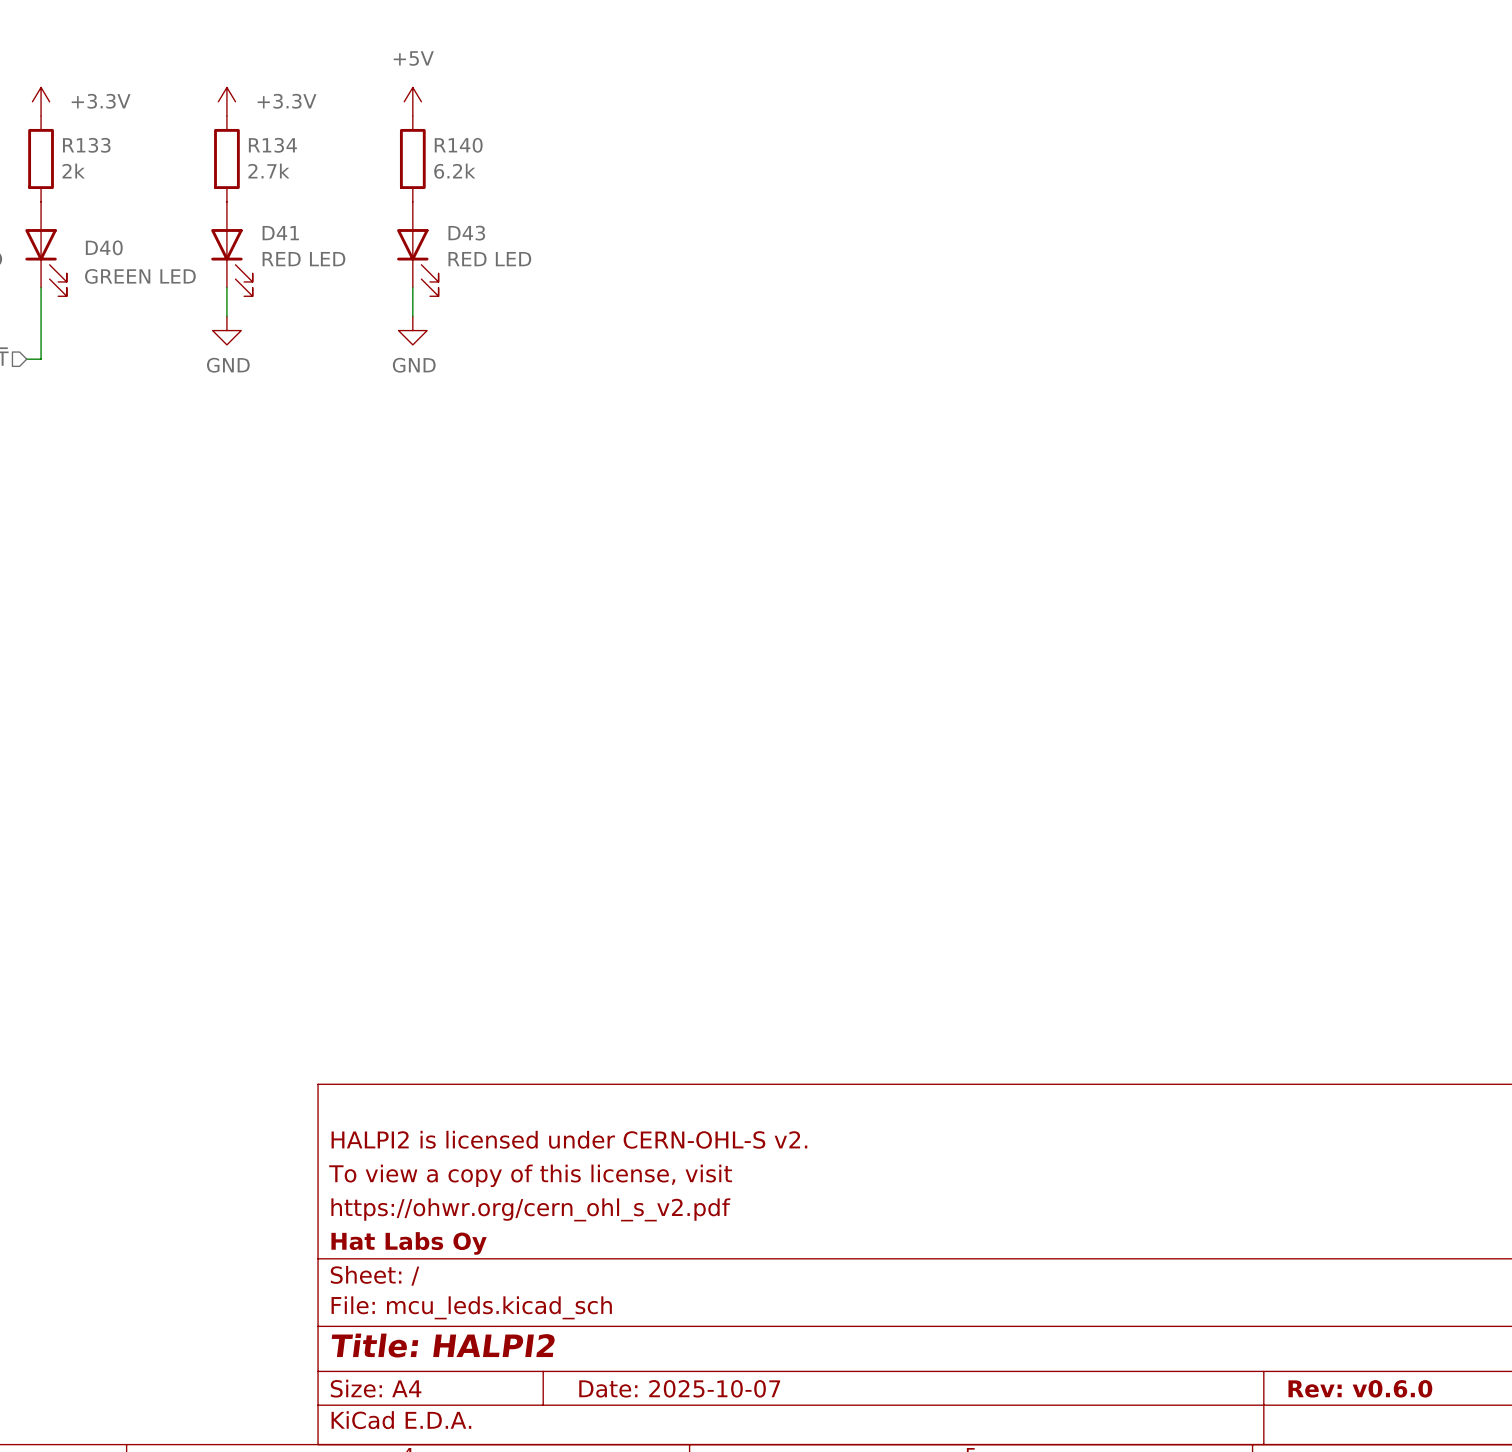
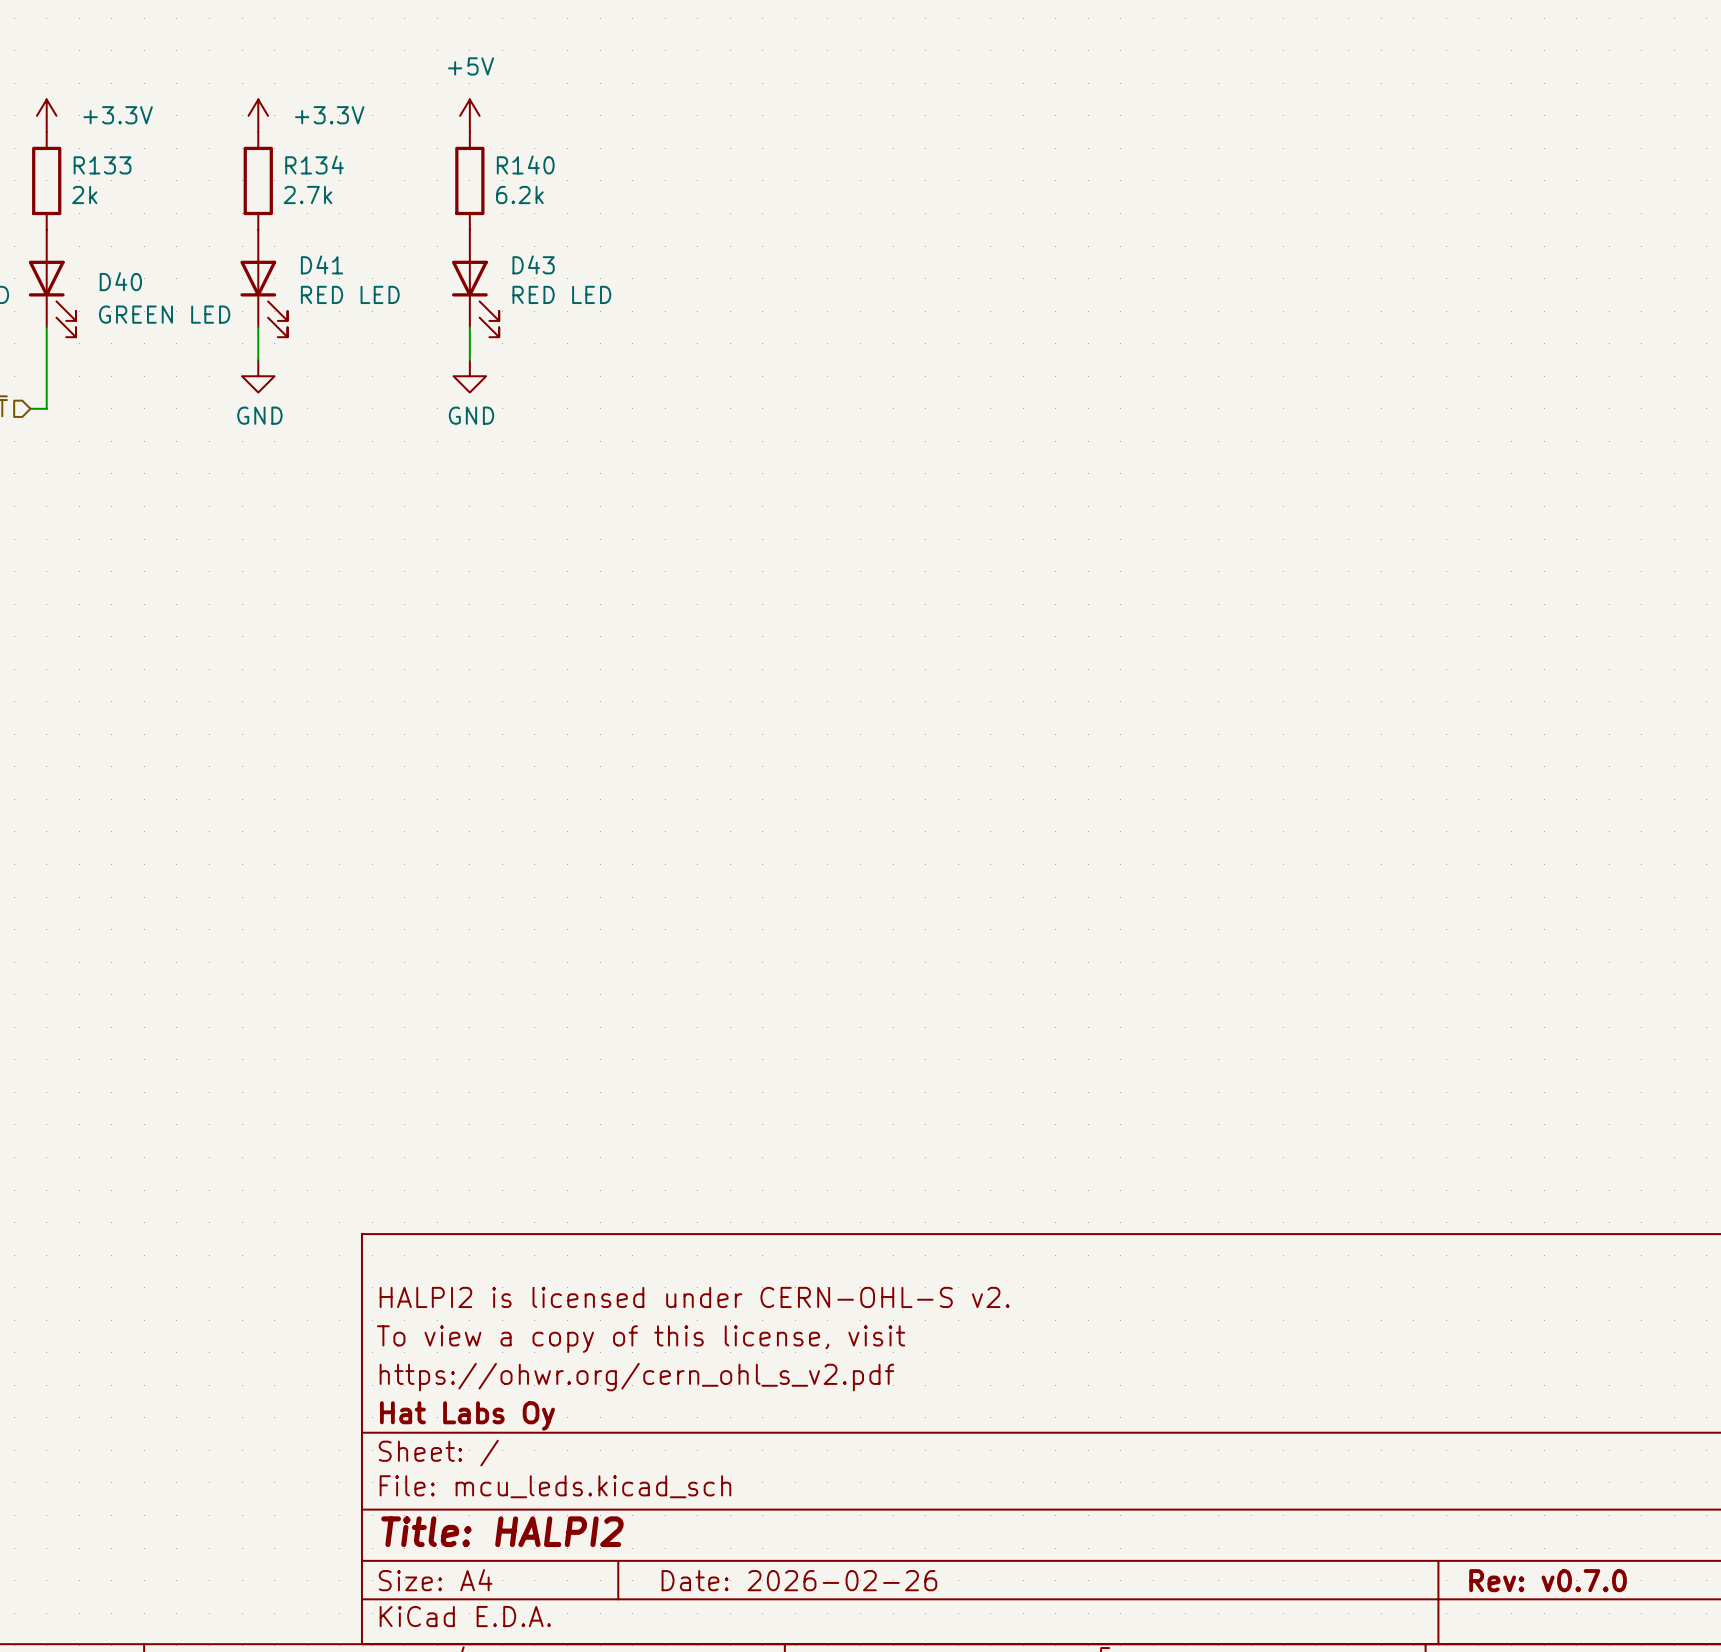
title block: Date: 2025-10-07 (679, 1388) -> Date: 2026-02-26 (799, 1580)
title block: Rev: v0.6.0 (1360, 1388) -> Rev: v0.7.0 (1548, 1580)

